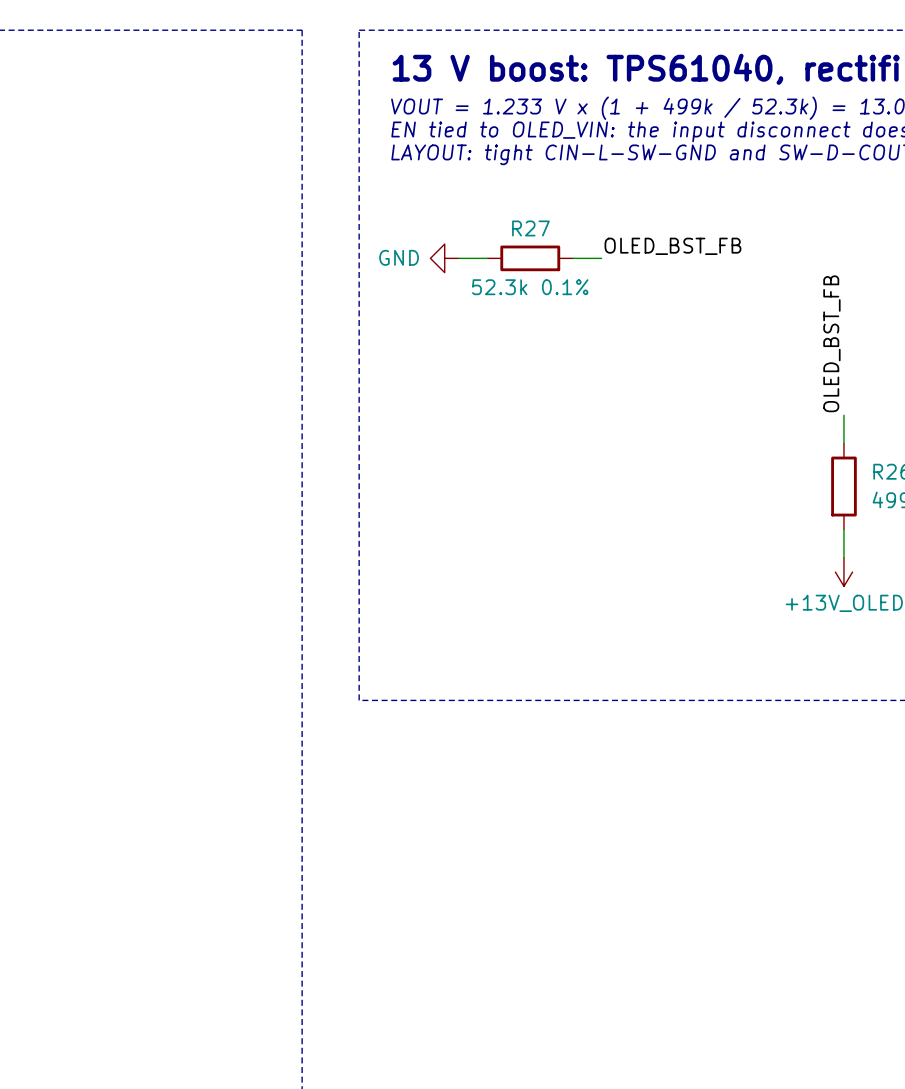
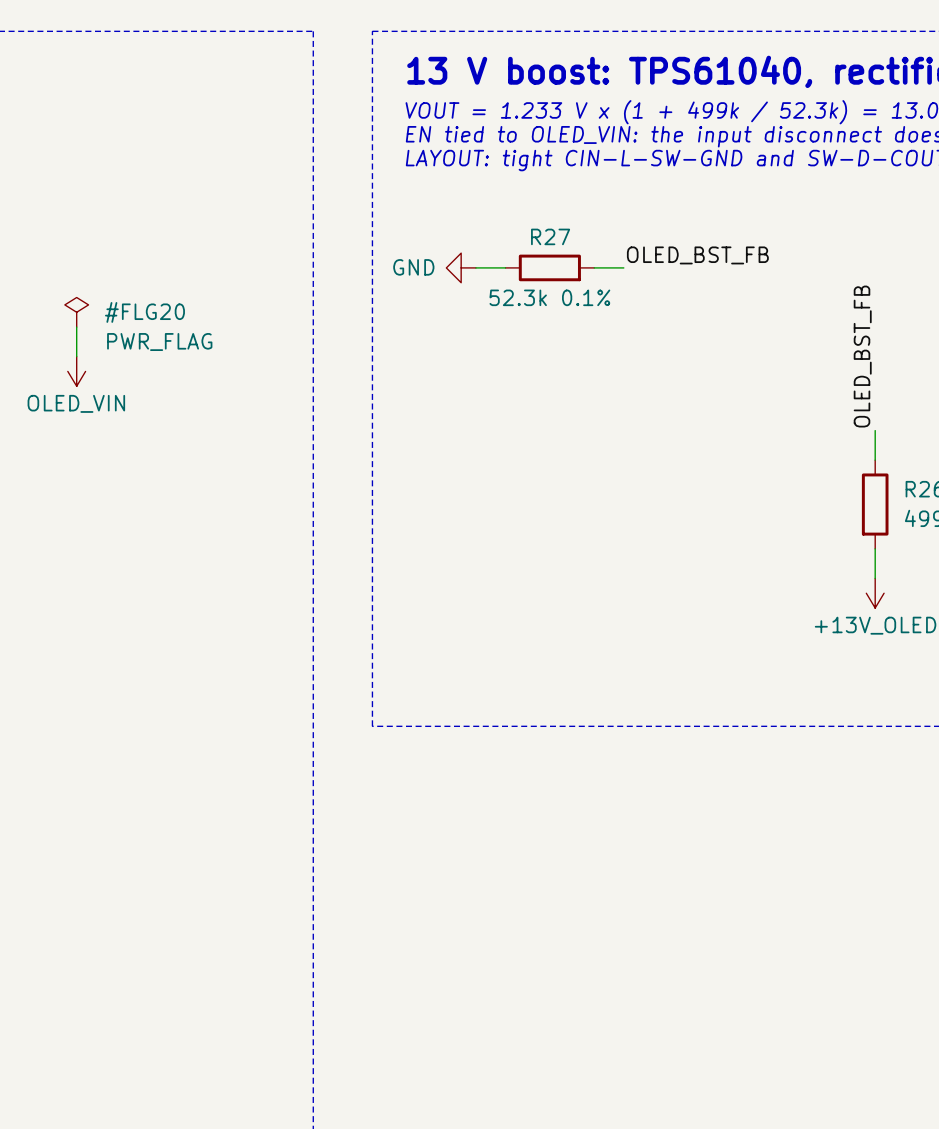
#FLG20: none -> PWR_FLAG (76, 312)
wire: none -> (76, 327) (76, 356)
power symbol: none -> OLED_VIN (76, 371)

